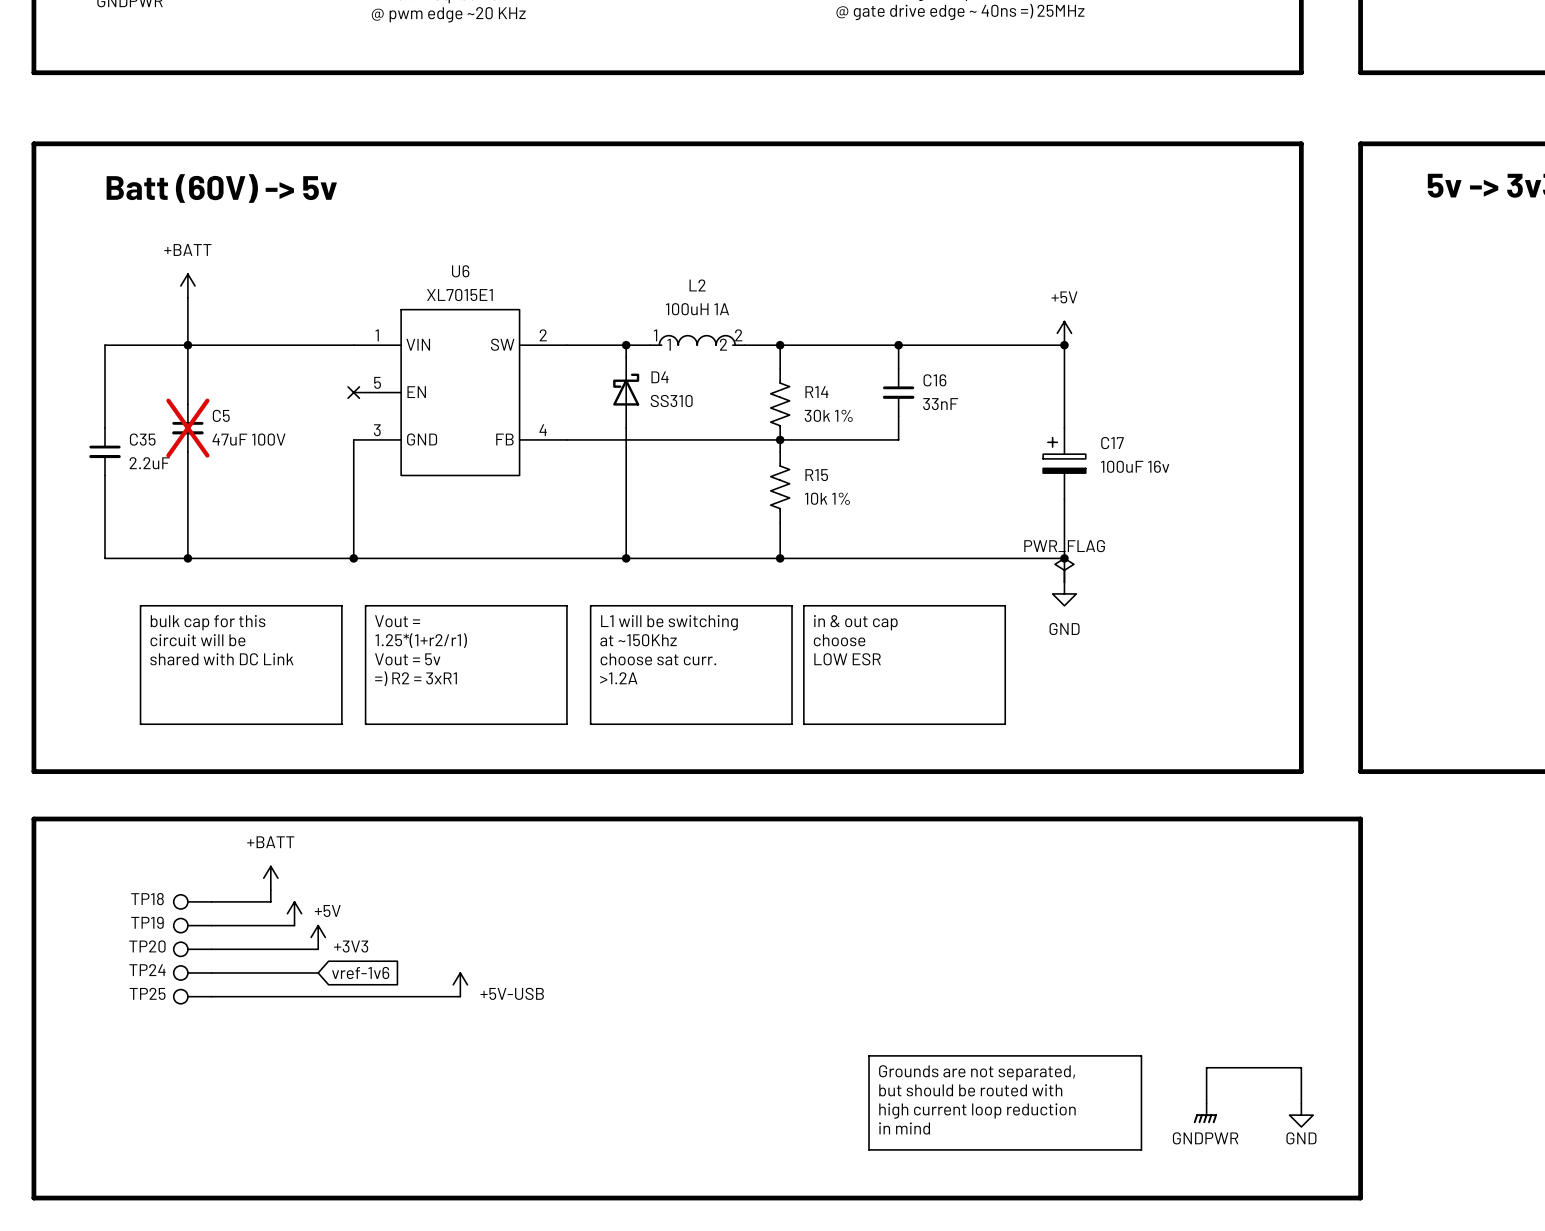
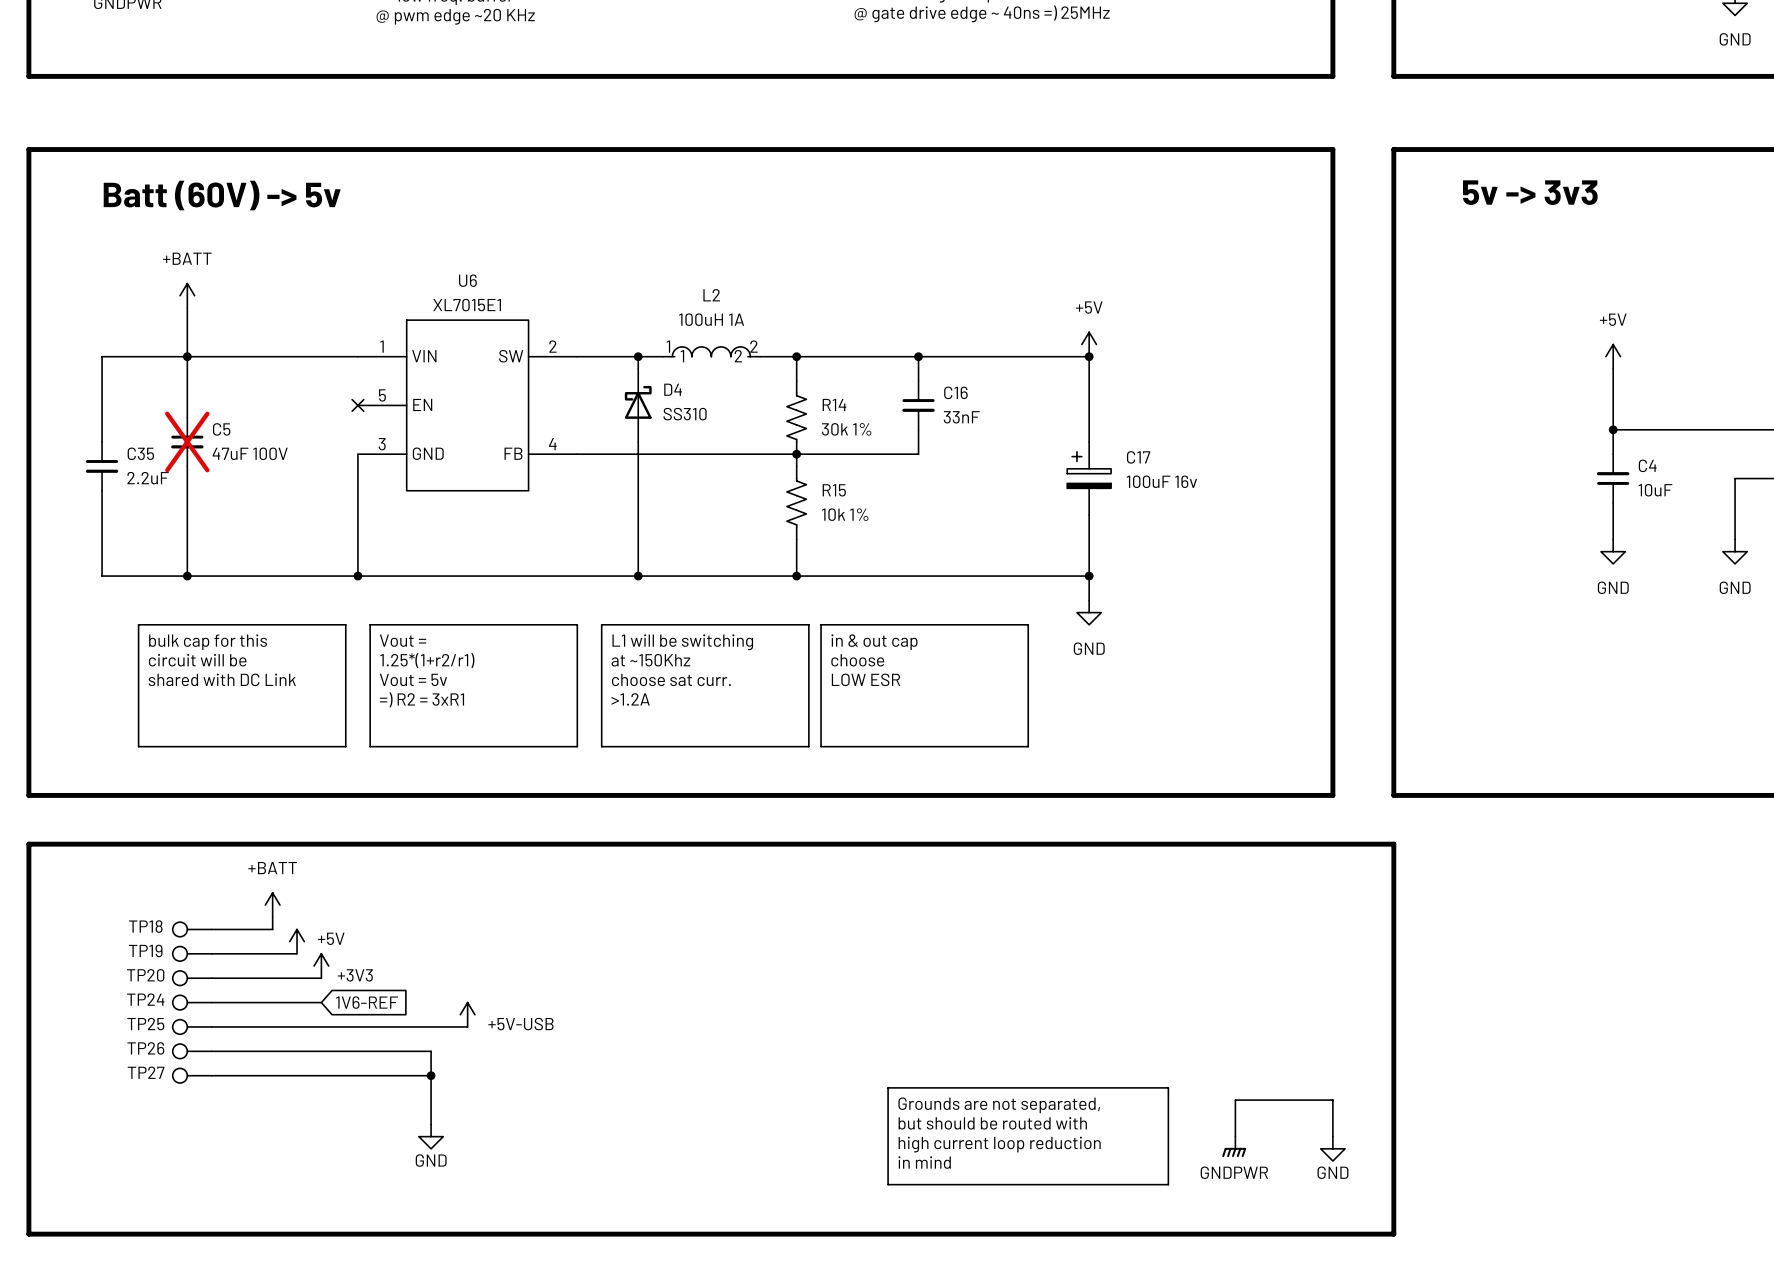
power symbol: PWR_FLAG (1064, 570) -> none
global label: vref-1v6 (360, 972) -> 1V6-REF (367, 1002)
TP26: none -> (192, 1051)
wire: none -> (211, 1051) (431, 1051) (431, 1124)
TP27: none -> (192, 1075)
wire: none -> (211, 1075) (431, 1075)
junction: none -> (431, 1075)
power symbol: none -> GND (431, 1136)

